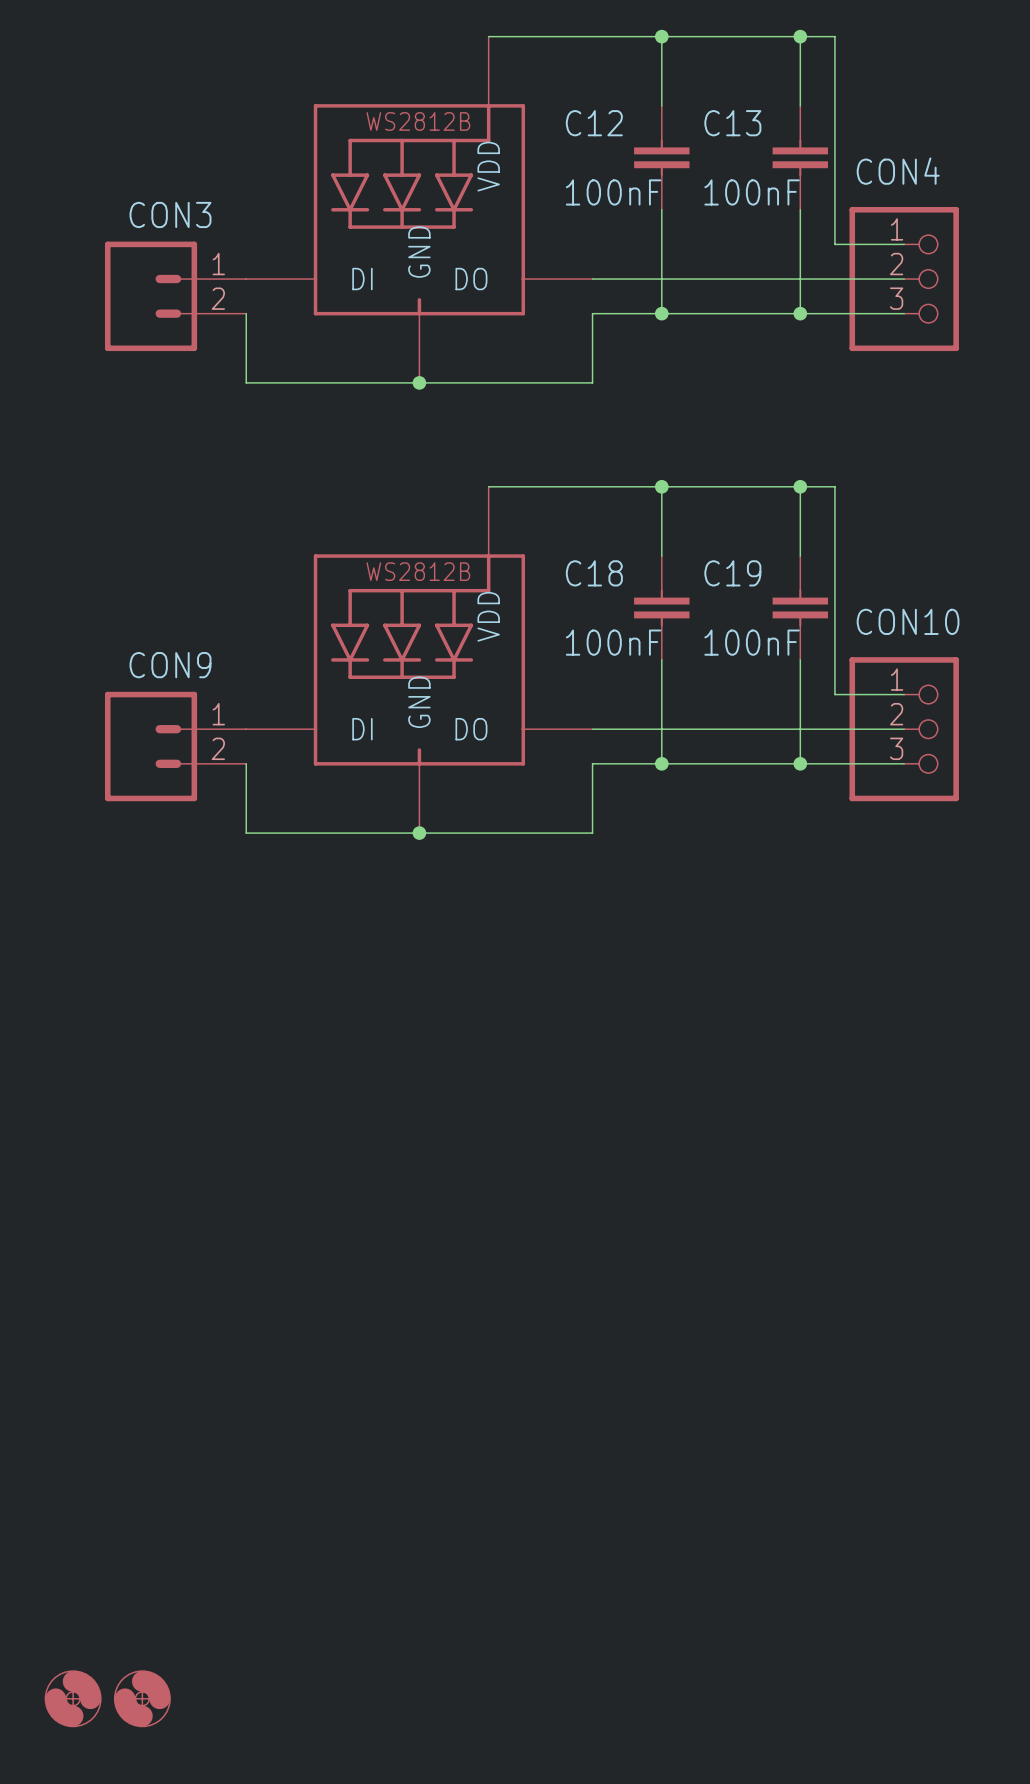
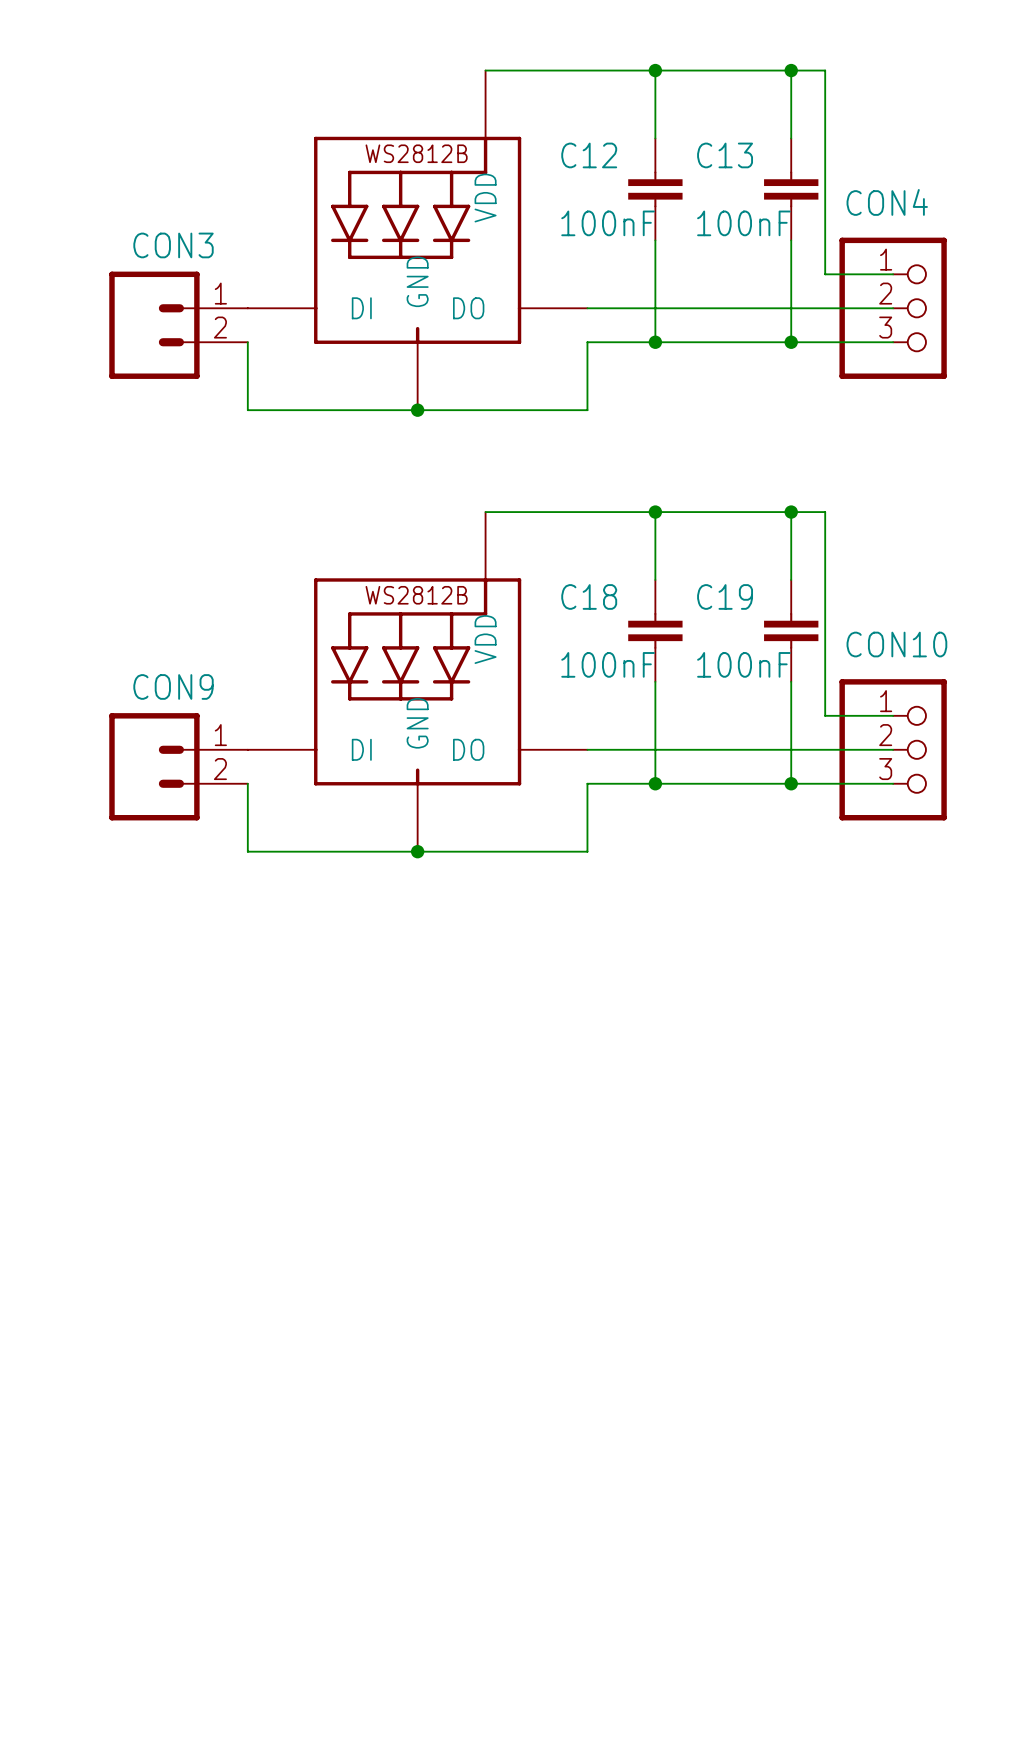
part: (73, 1698) -> none
part: (142, 1698) -> none

